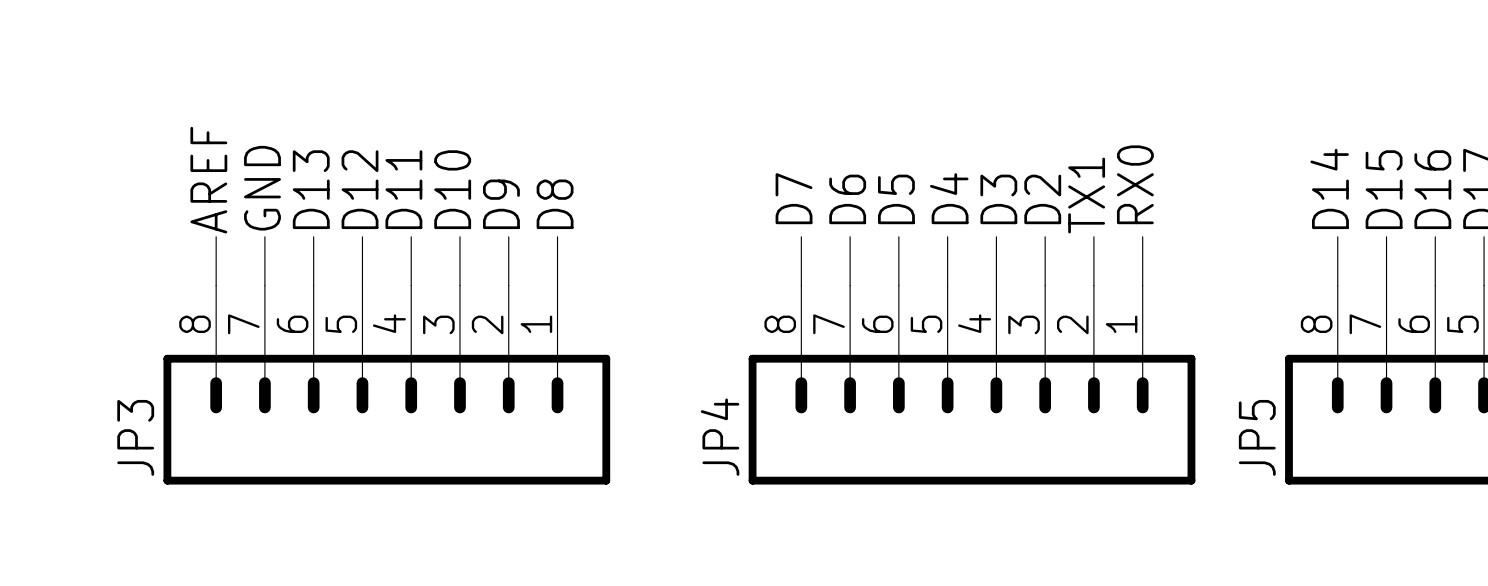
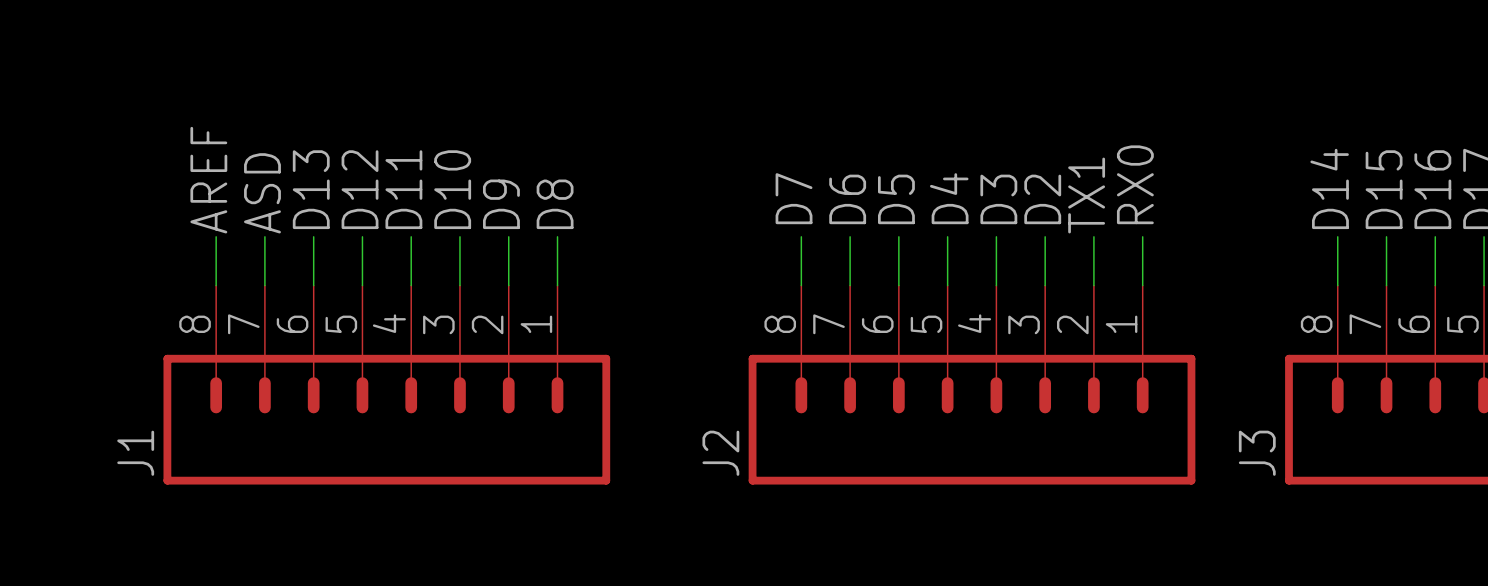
label: GND (262, 188) -> ASD (262, 193)
JP3 name: JP3 (135, 437) -> J1 (135, 453)
JP4 name: JP4 (720, 437) -> J2 (720, 453)
JP5 name: JP5 (1257, 437) -> J3 (1257, 453)

